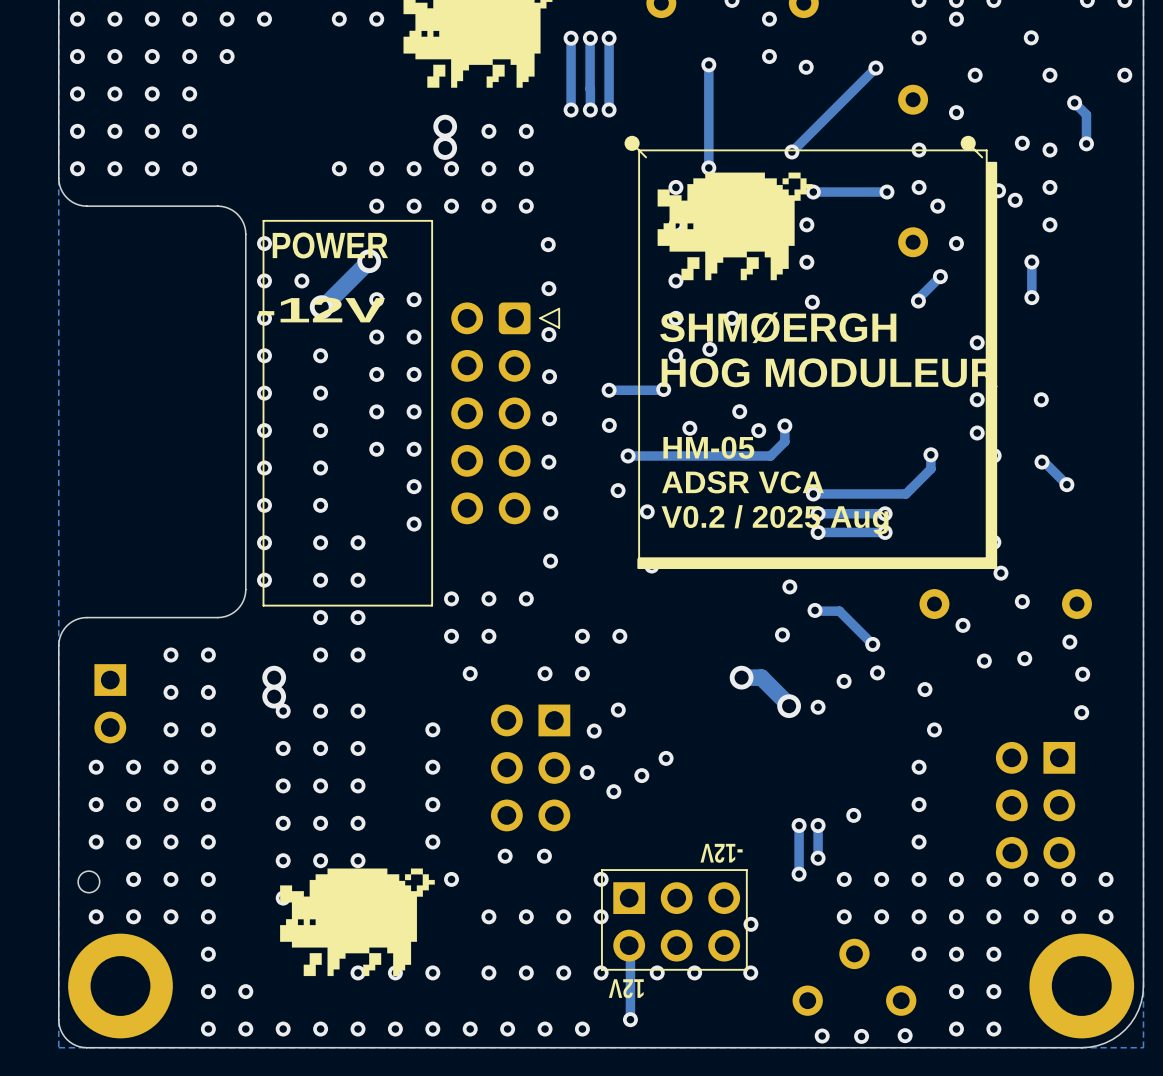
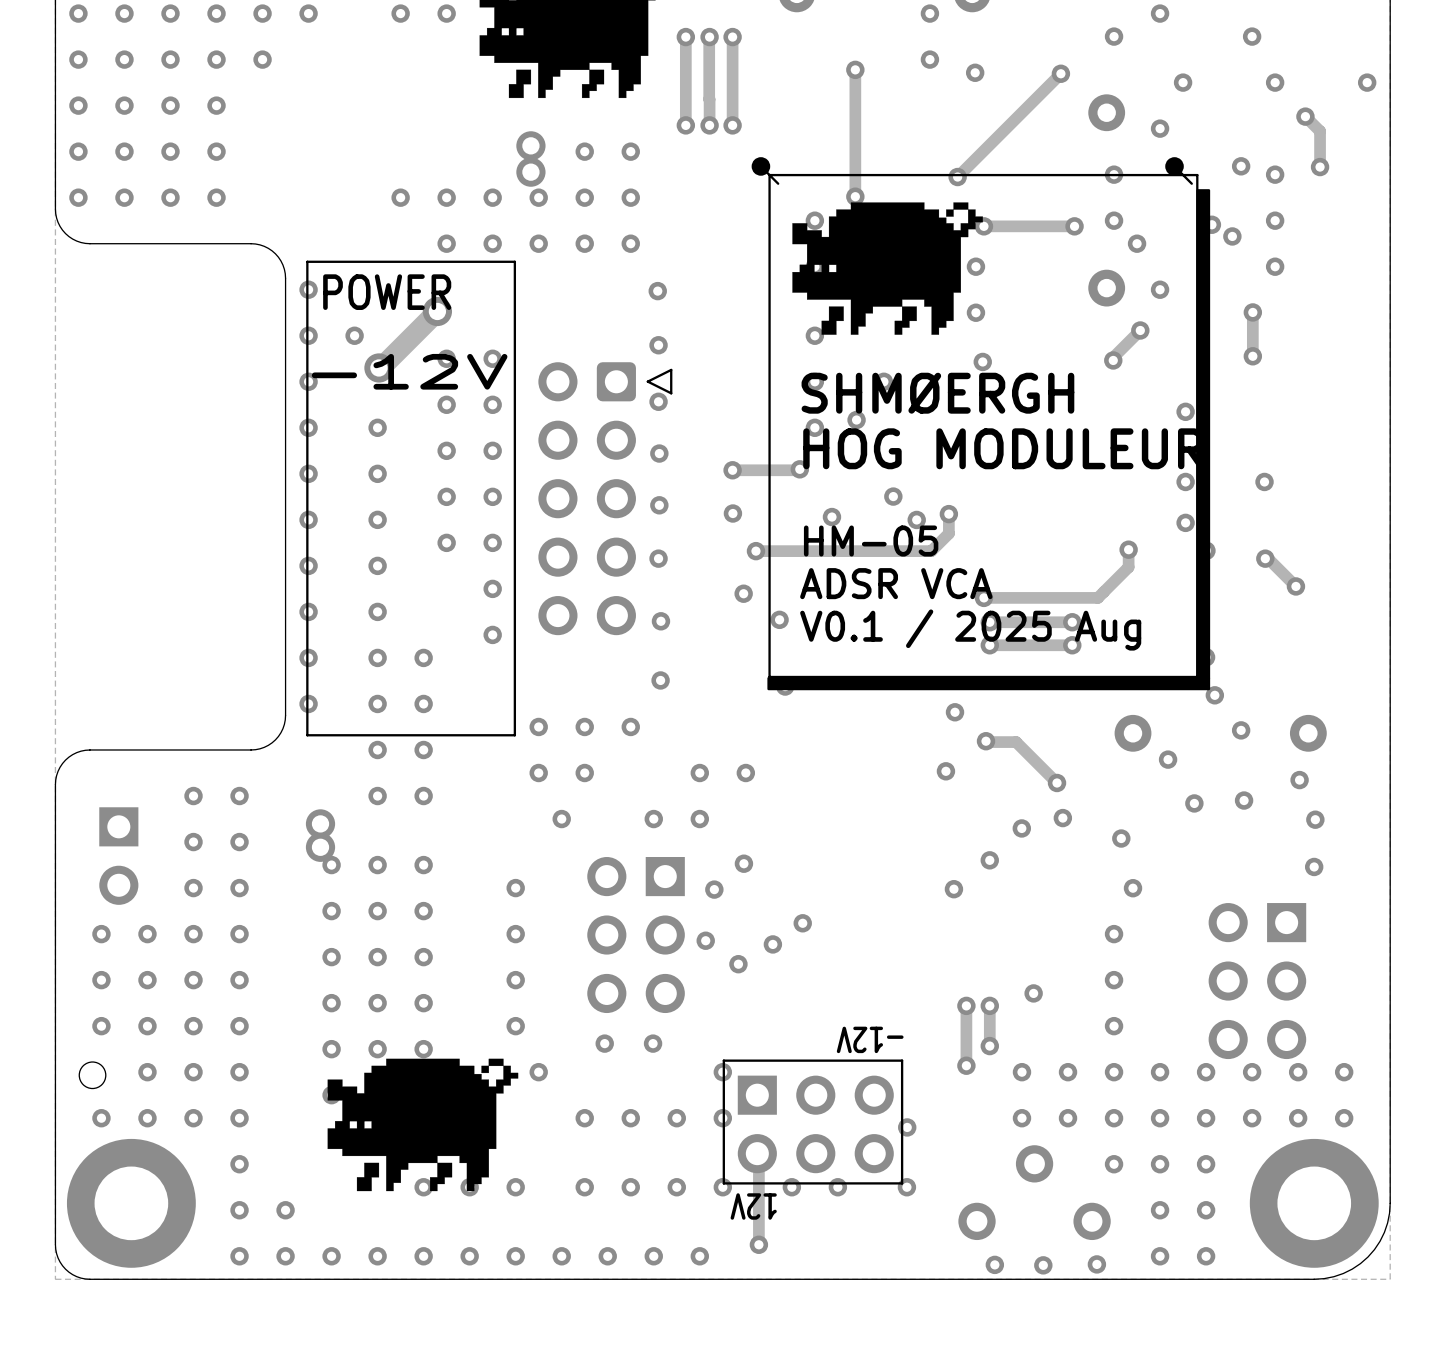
text: V0.2 / 2025 Aug (775, 519) -> V0.1 / 2025 Aug (970, 630)
track: (741, 677) (761, 677) (789, 706) -> none
via: (741, 677) -> none
via: (789, 706) -> none
via: none -> (953, 889)

